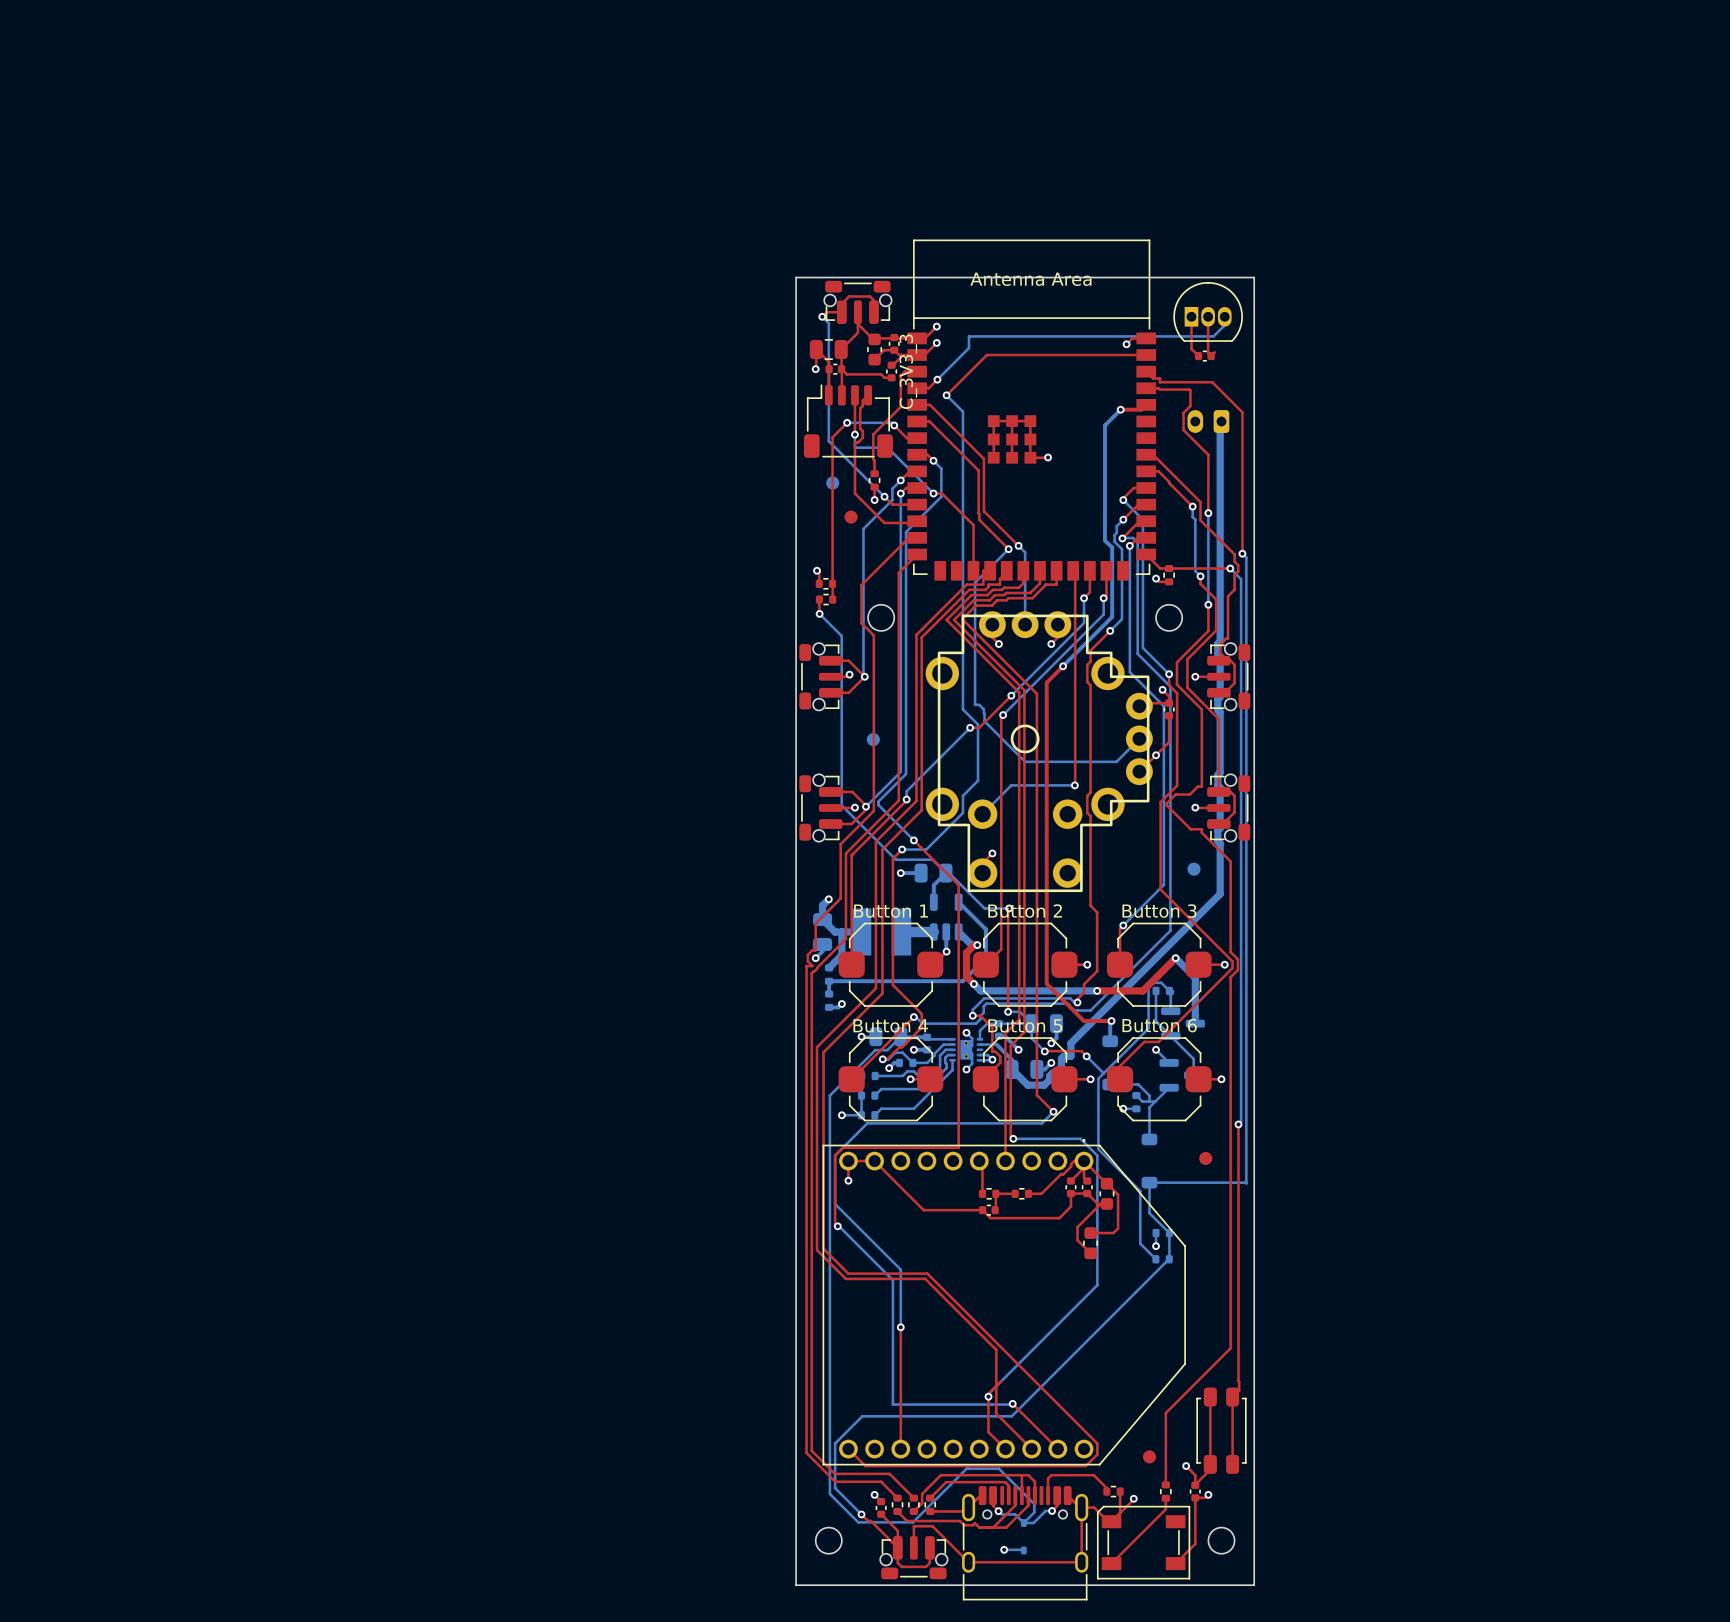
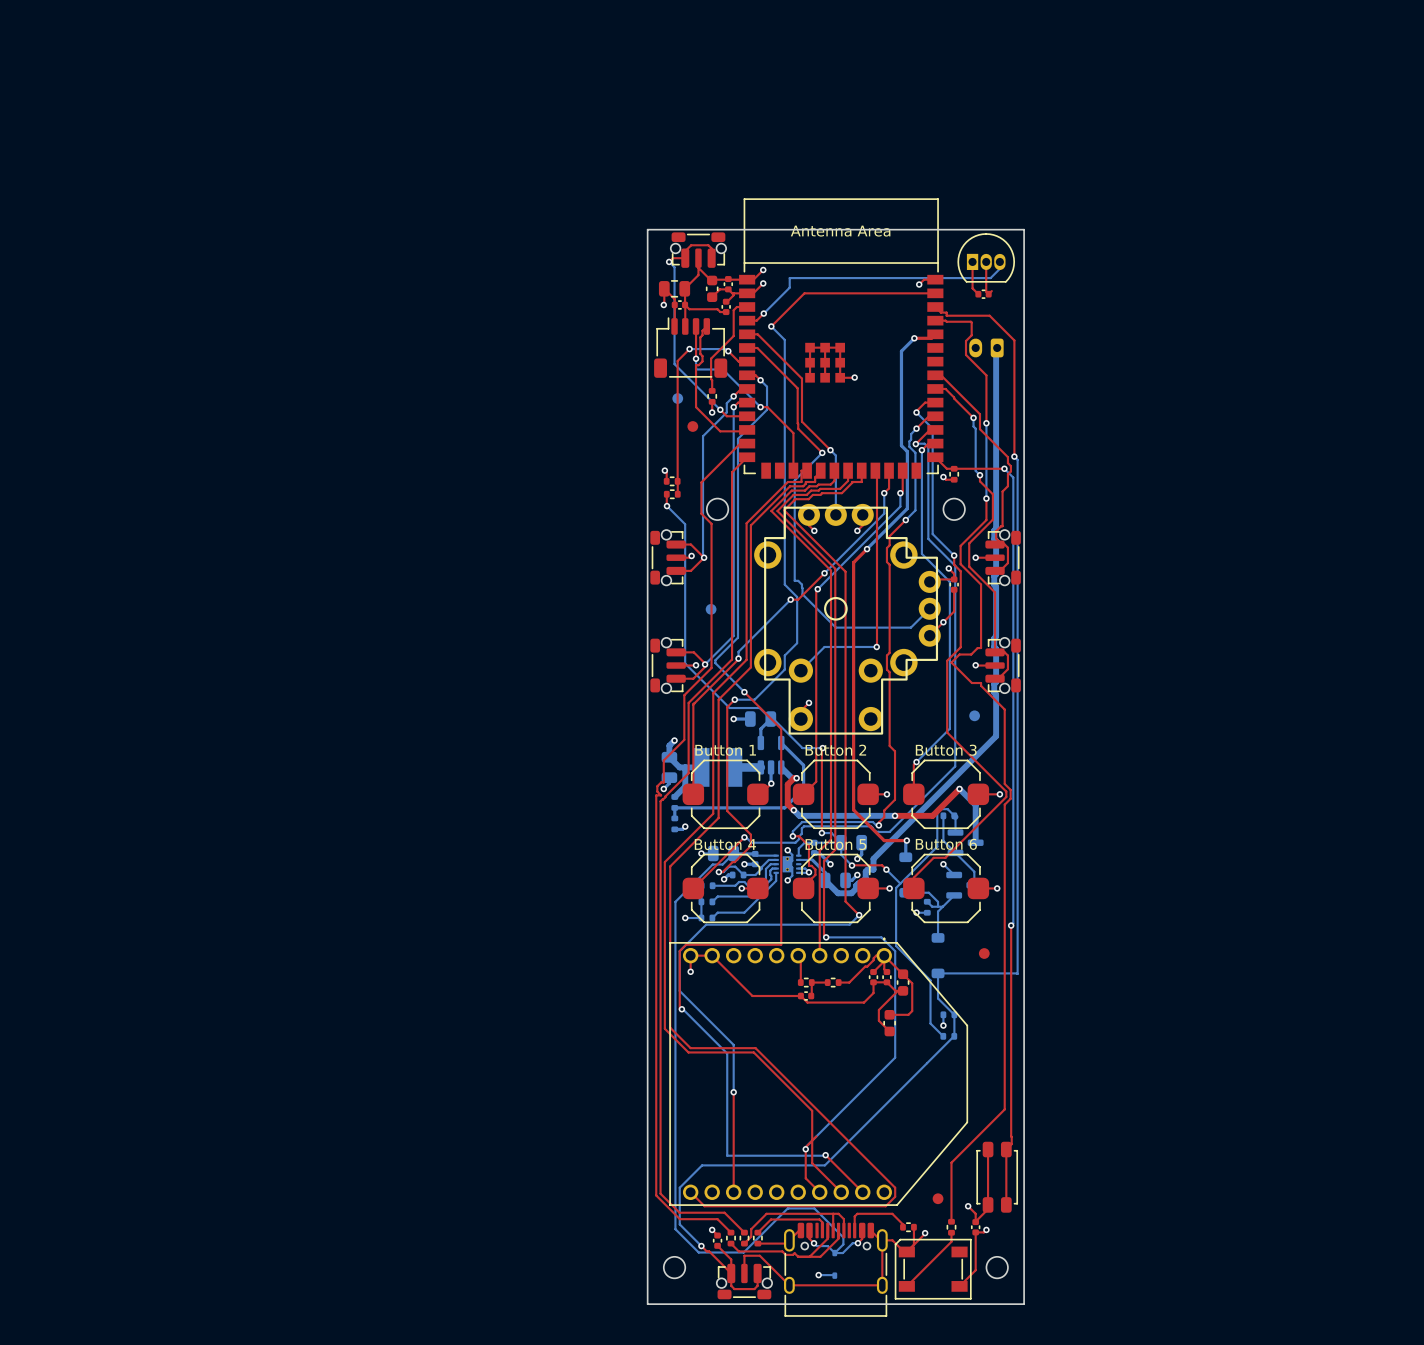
C_3V3_3 name: C_3V3_3 (908, 371) -> none

